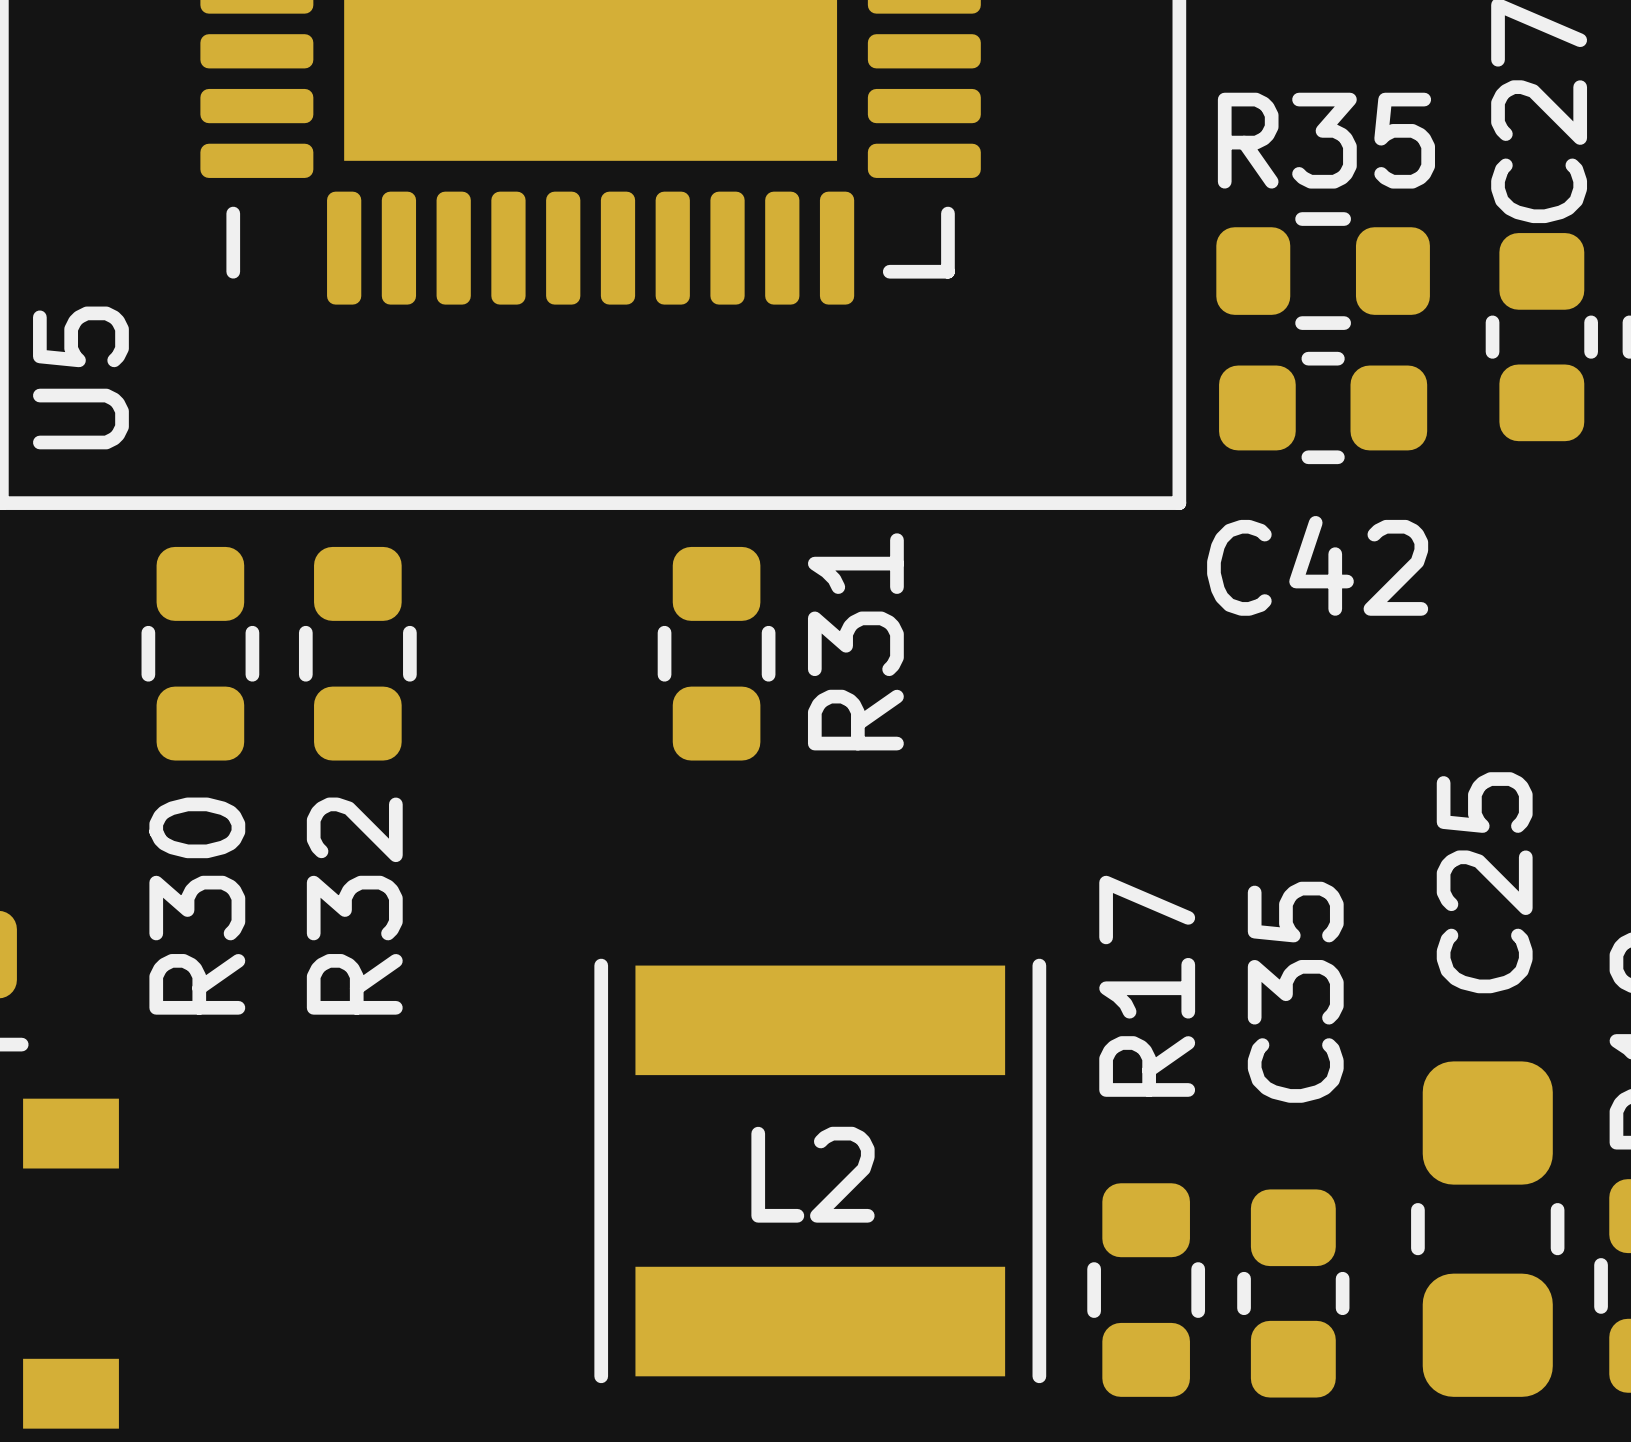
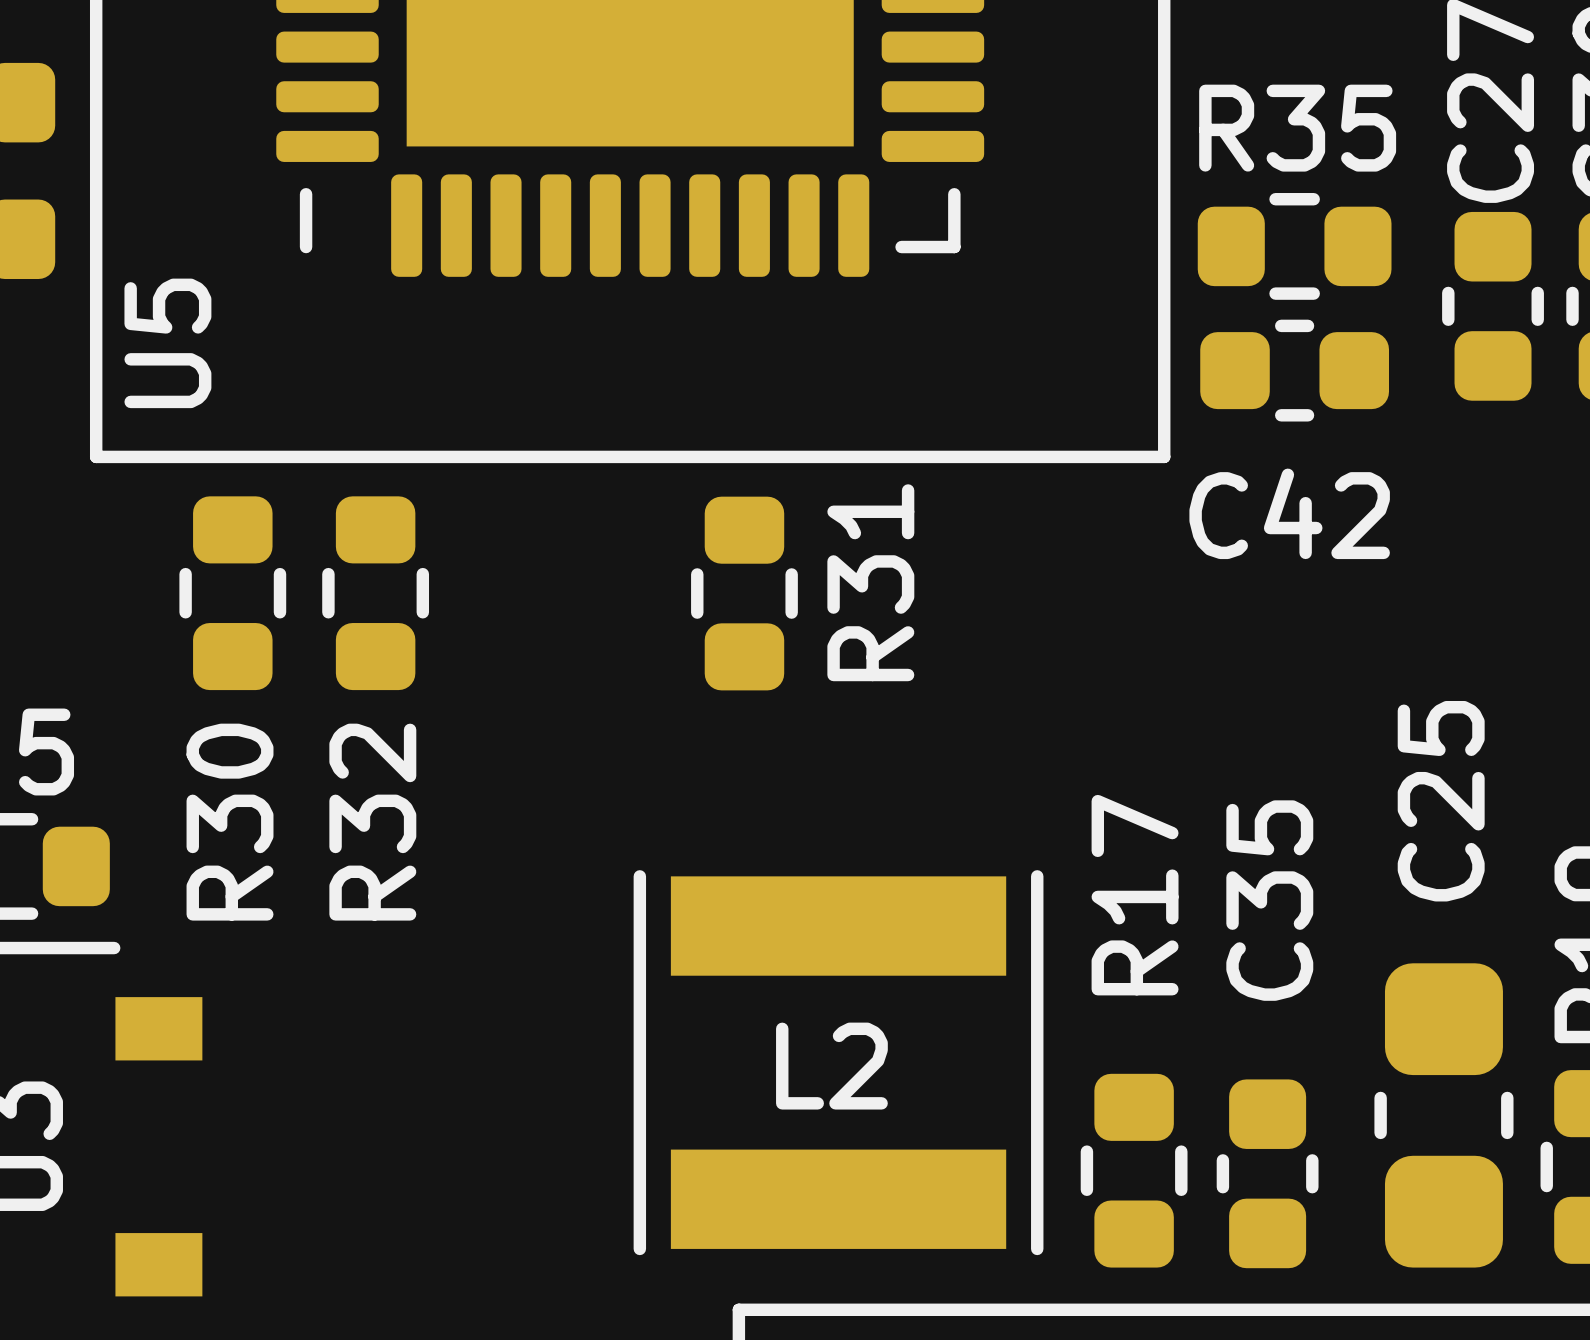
R30 position: (200, 653) -> (232, 593)
R32 position: (357, 653) -> (375, 593)

